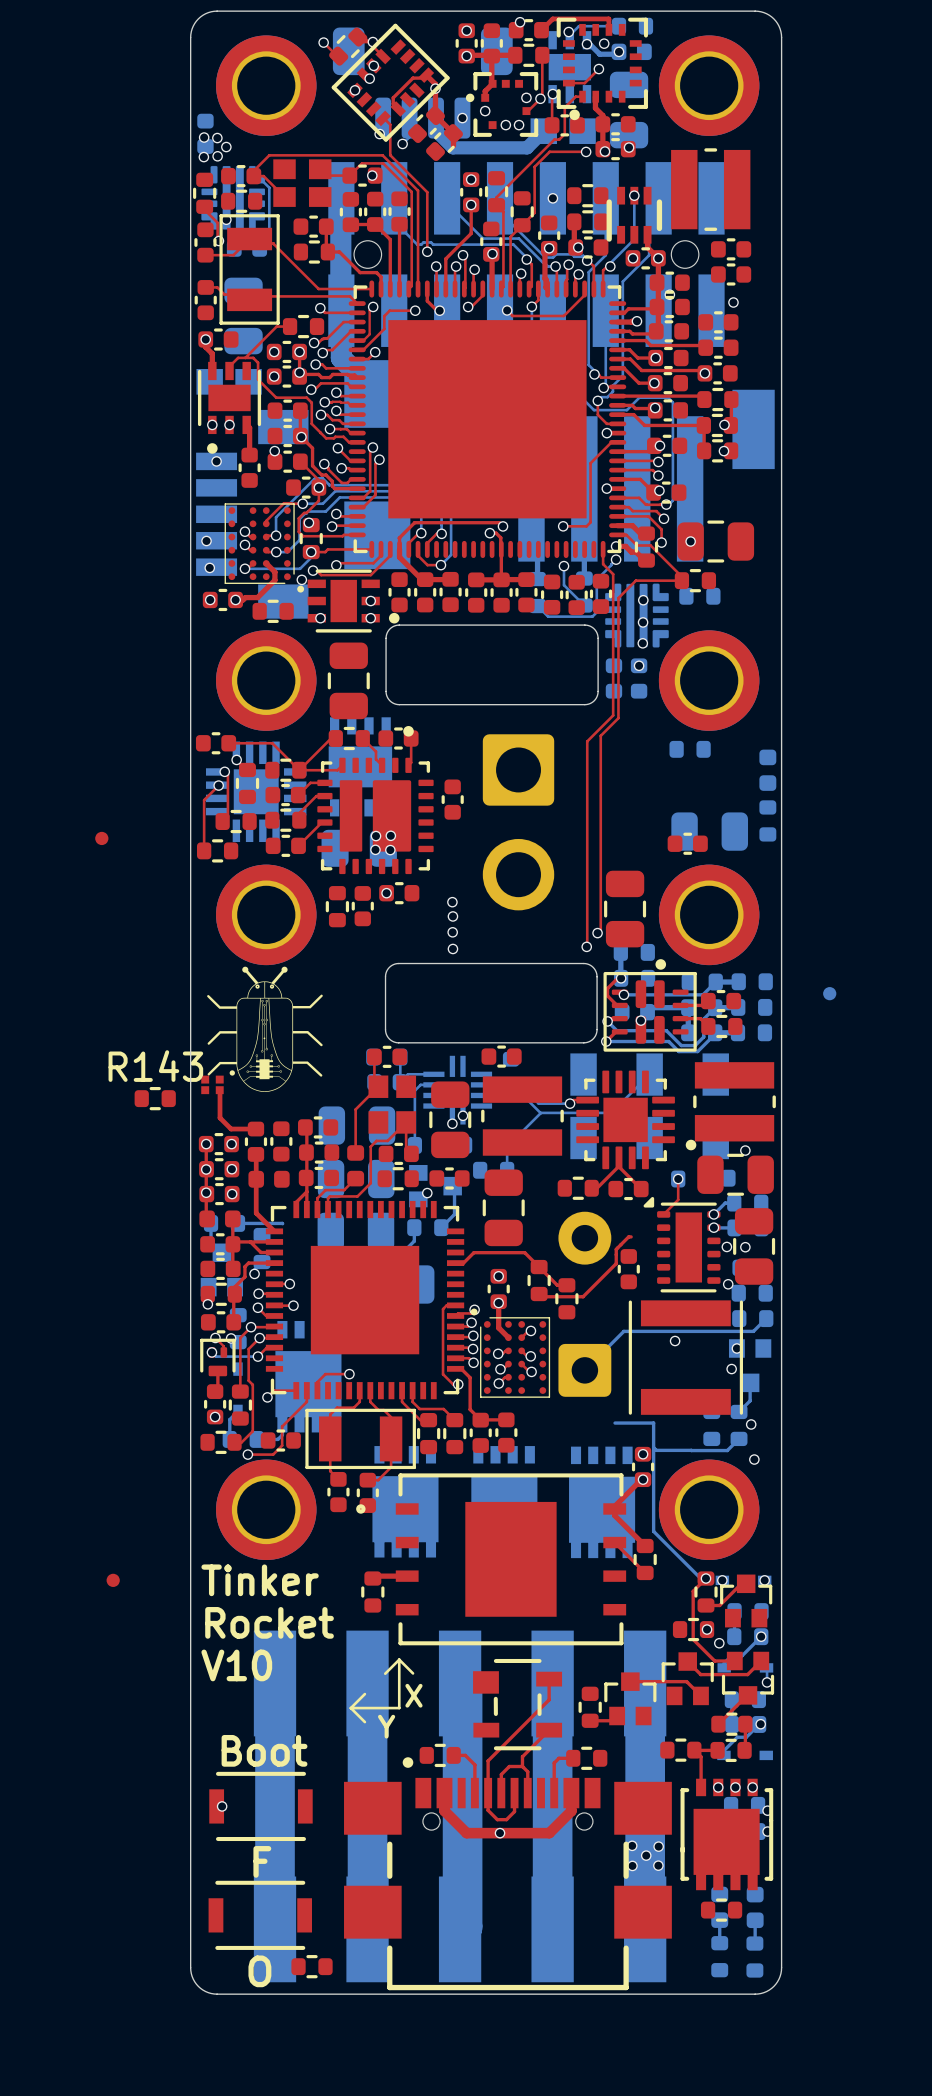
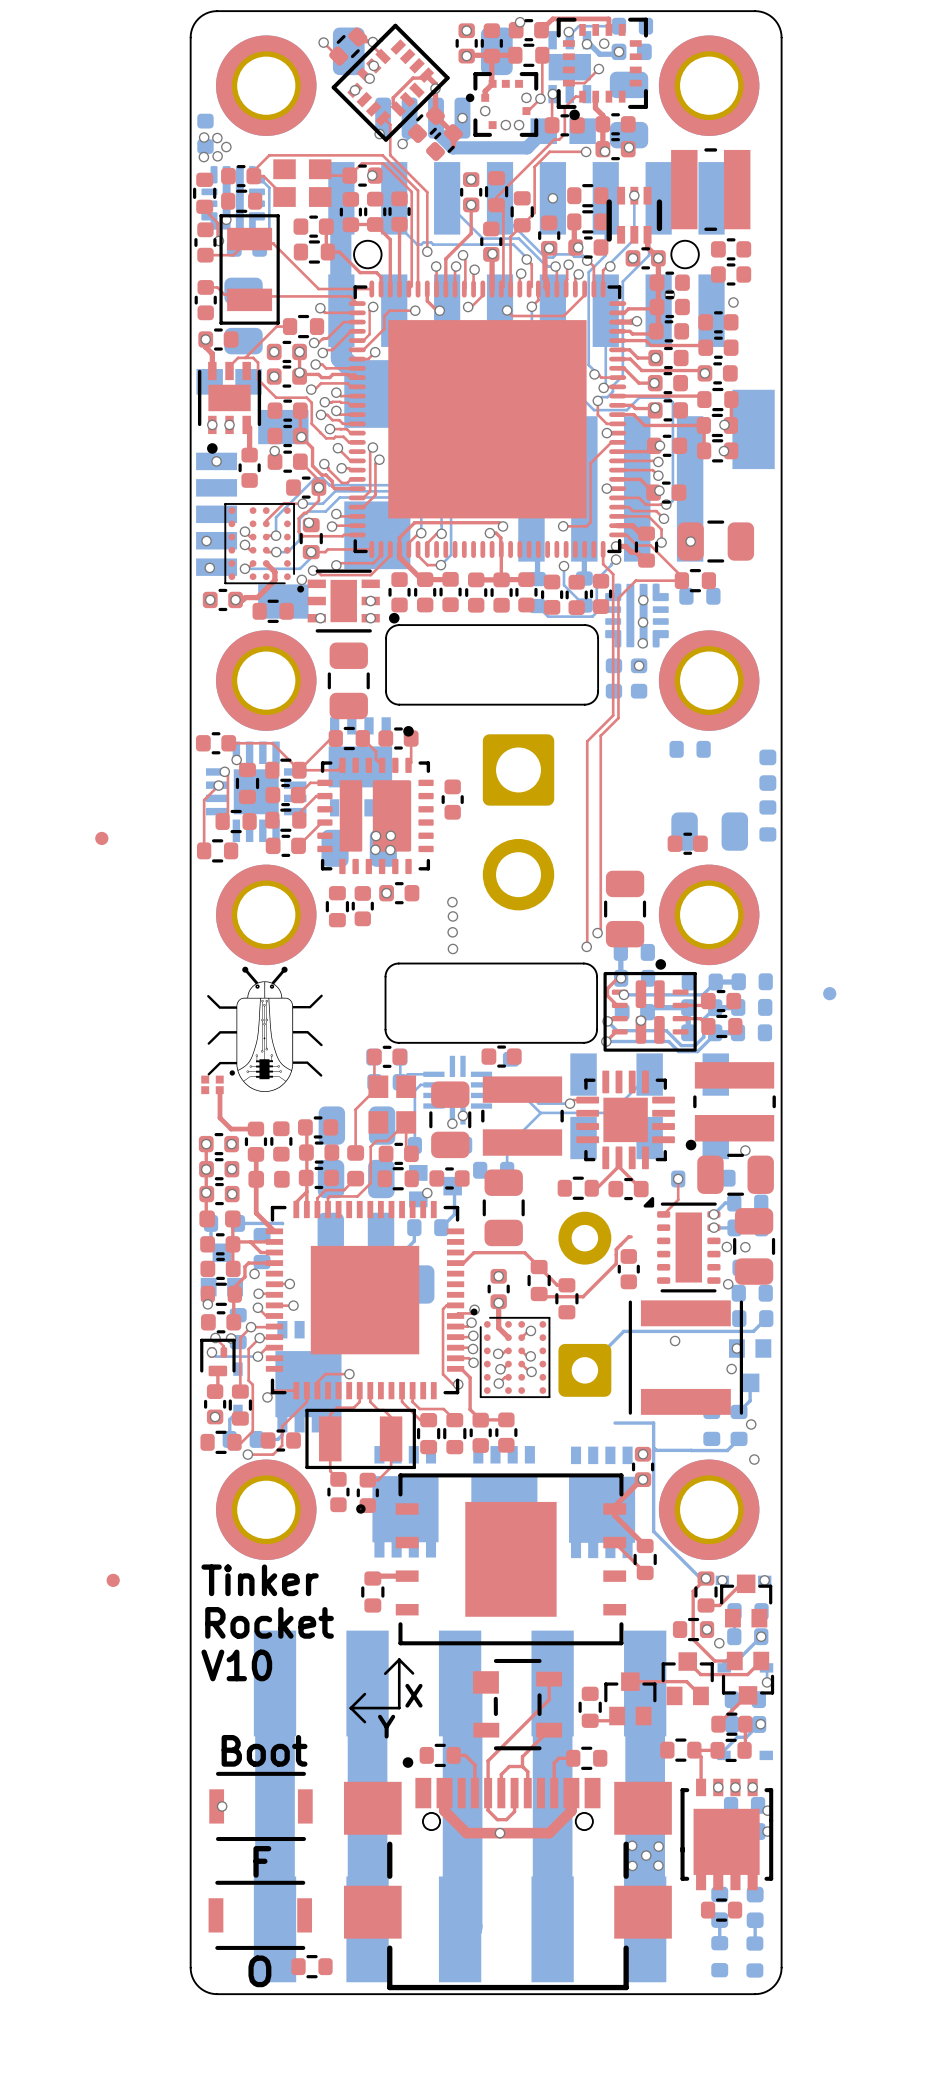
R143: (155, 1098) -> none

